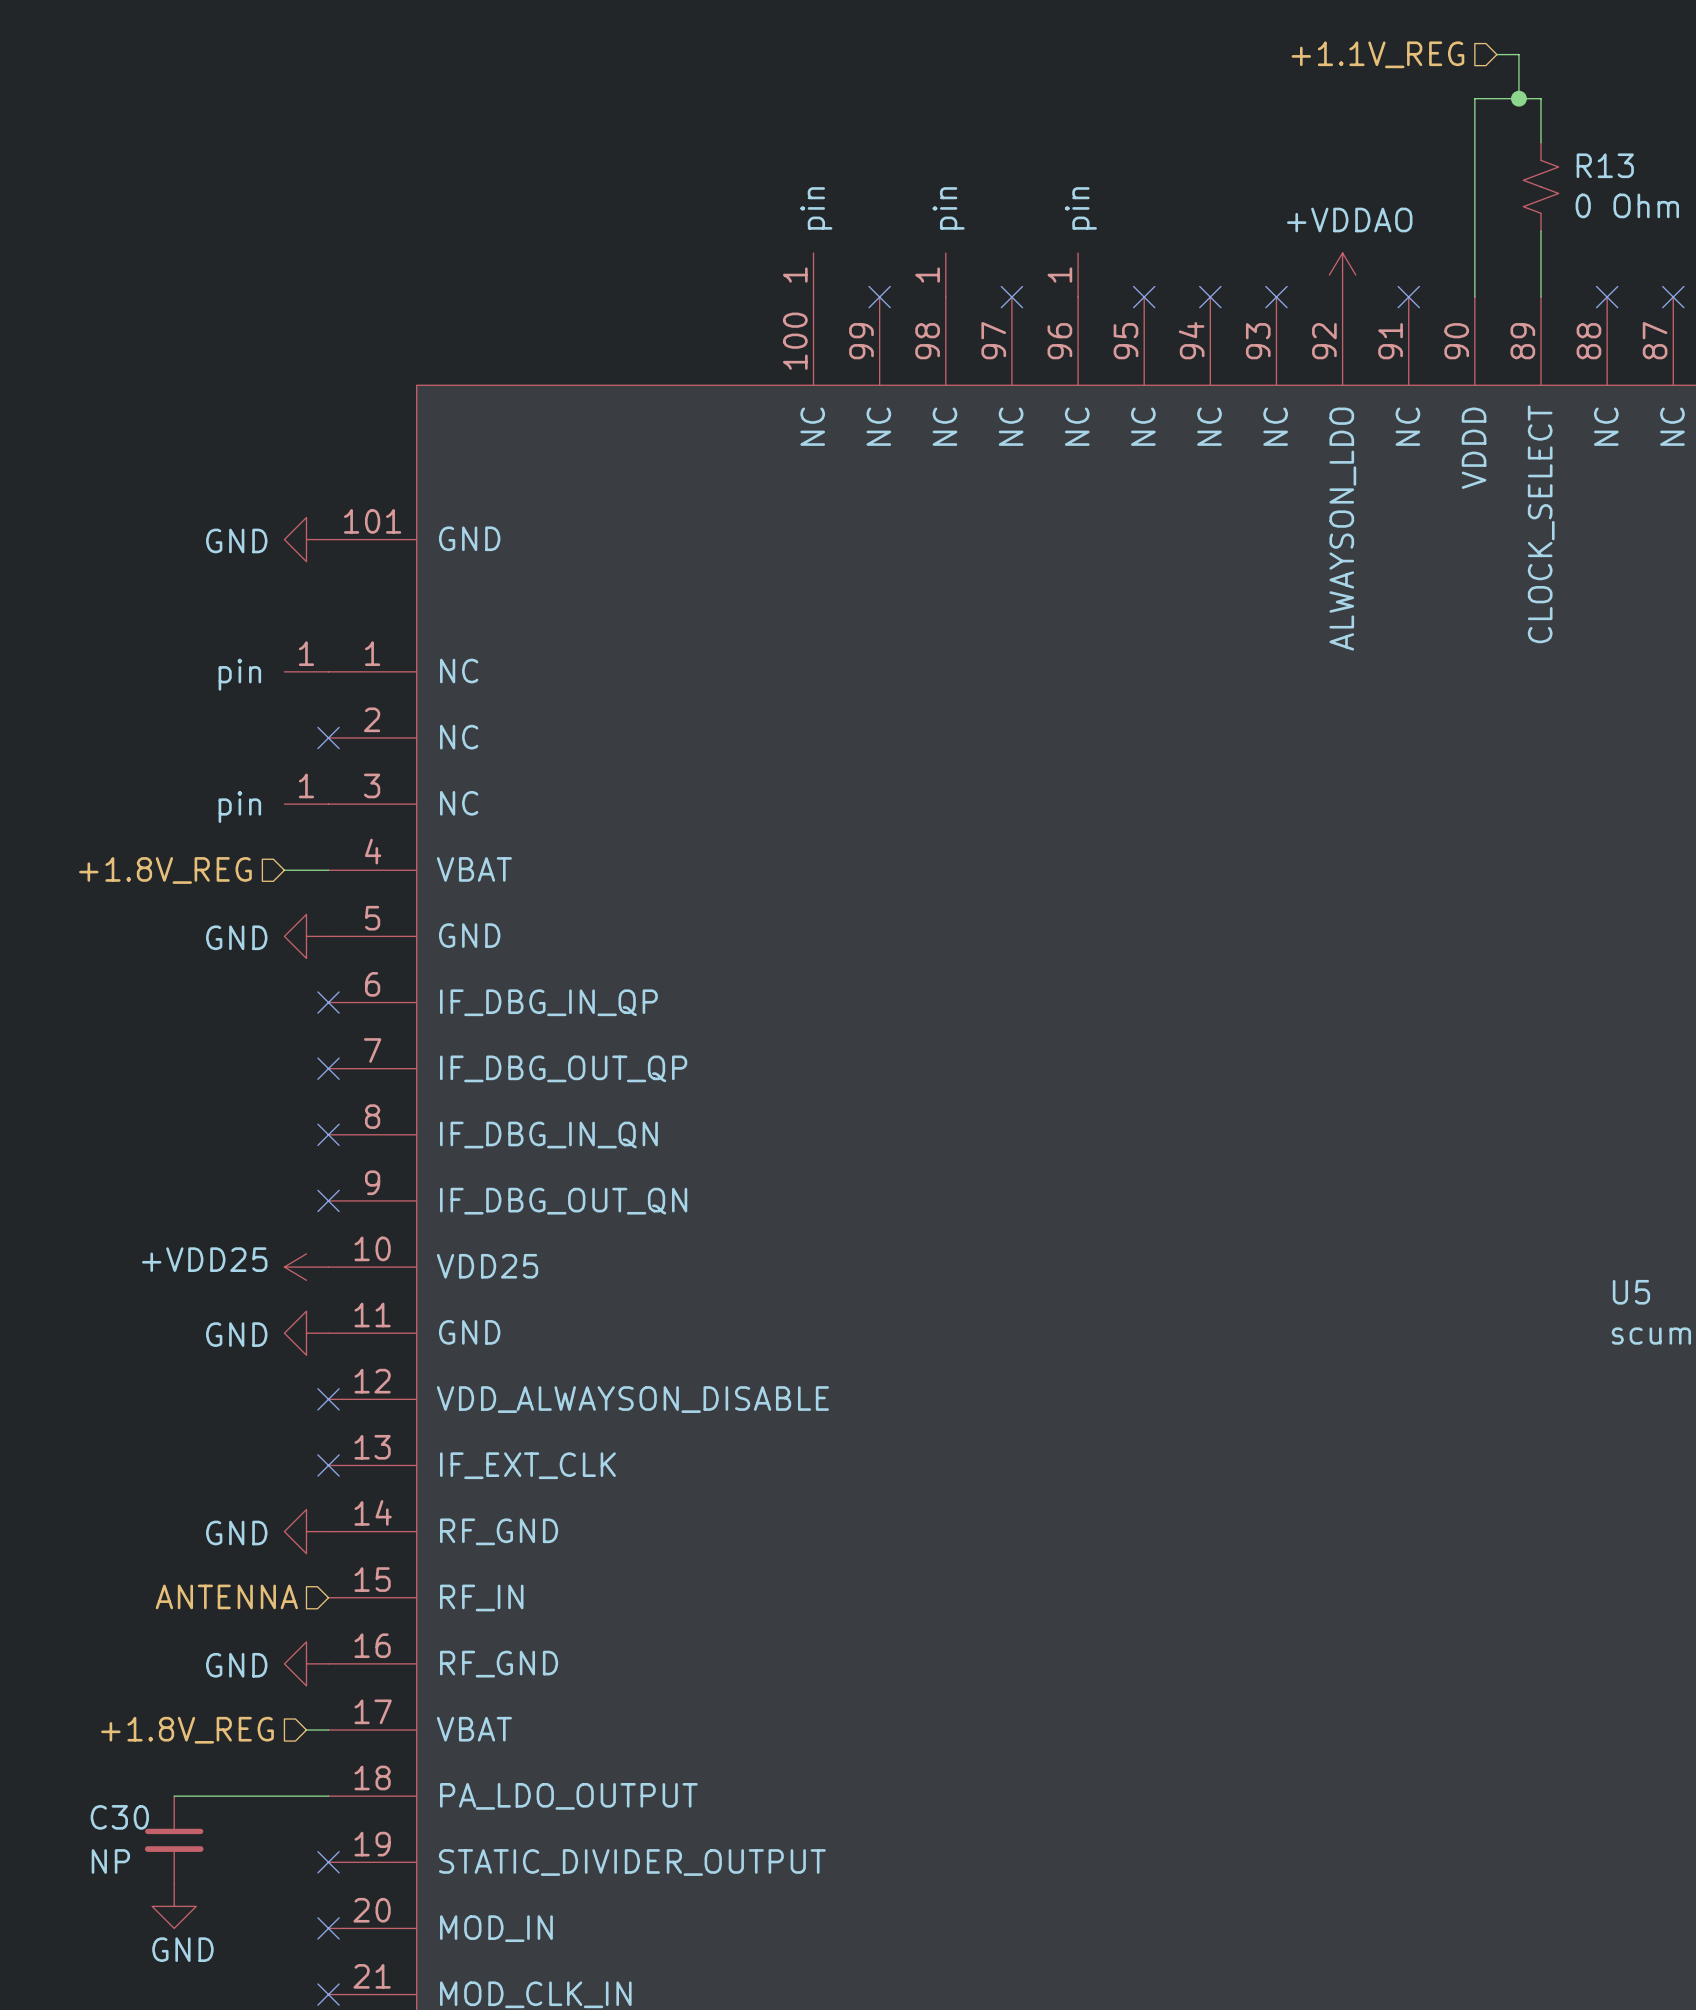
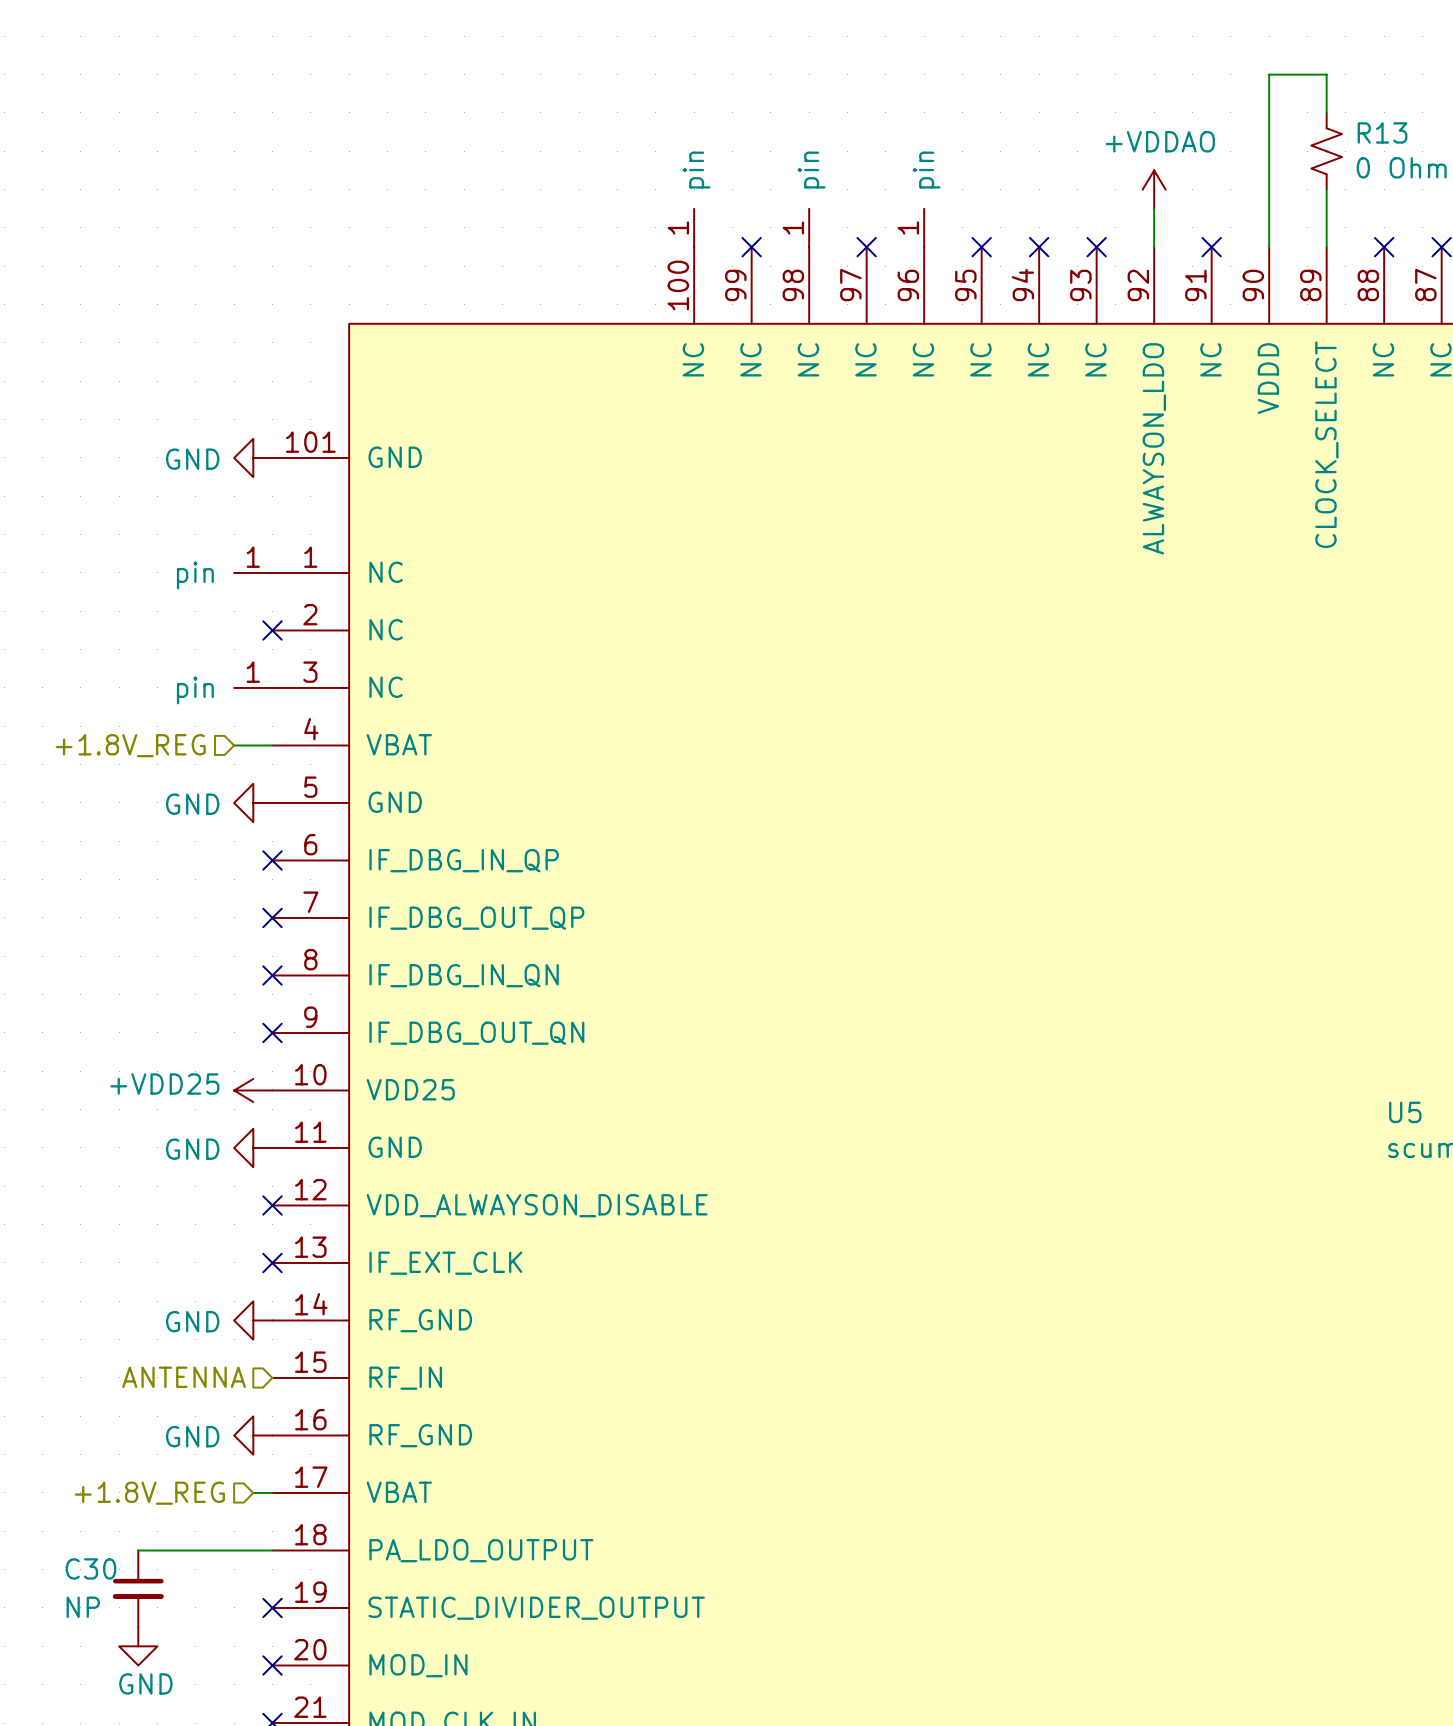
hierarchical label: +1.1V_REG (1377, 54) -> none
wire: (1496, 54) (1518, 54) (1518, 98) -> none
junction: (1518, 98) -> none
power symbol position: +VDDAO (1342, 275) -> +VDDAO (1154, 189)

